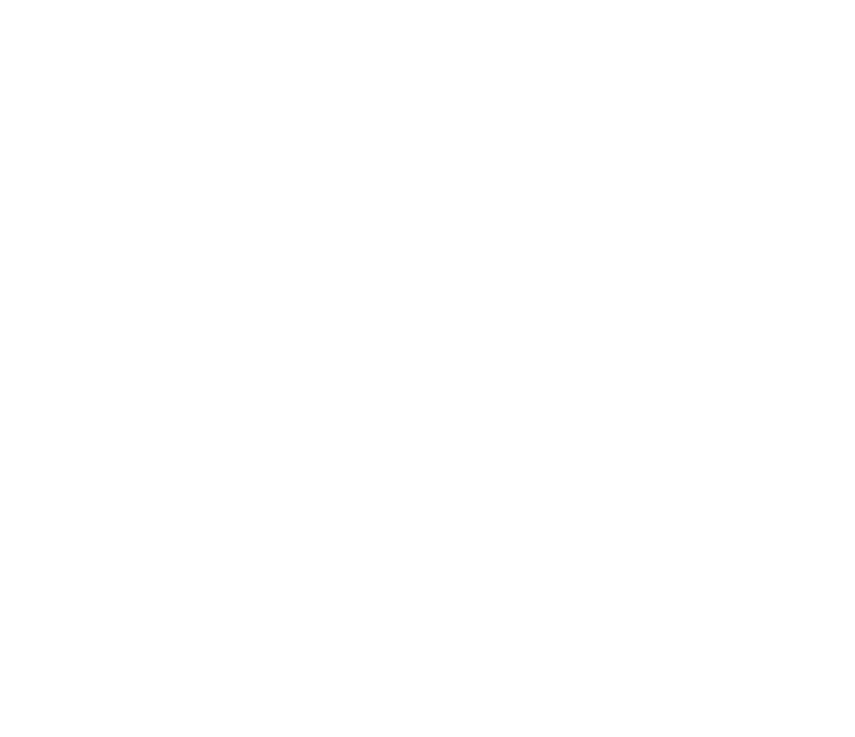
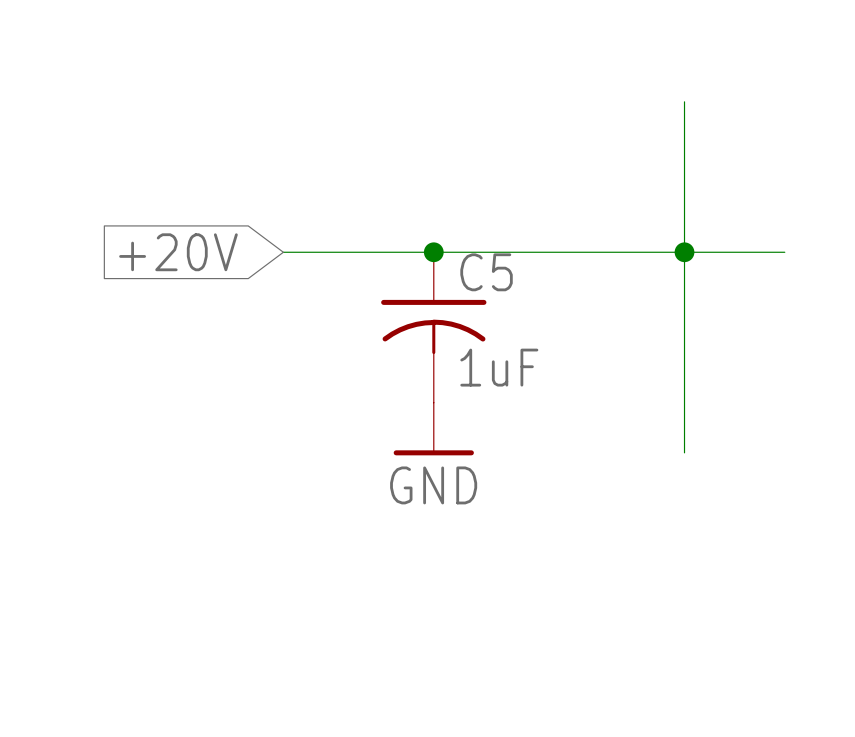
wire: none -> (684, 101) (684, 452)
global label: none -> +20V (178, 252)
wire: none -> (283, 252) (784, 252)
junction: none -> (433, 252)
junction: none -> (684, 252)
C5: none -> 1uF (433, 327)
power symbol: none -> GND (433, 429)

